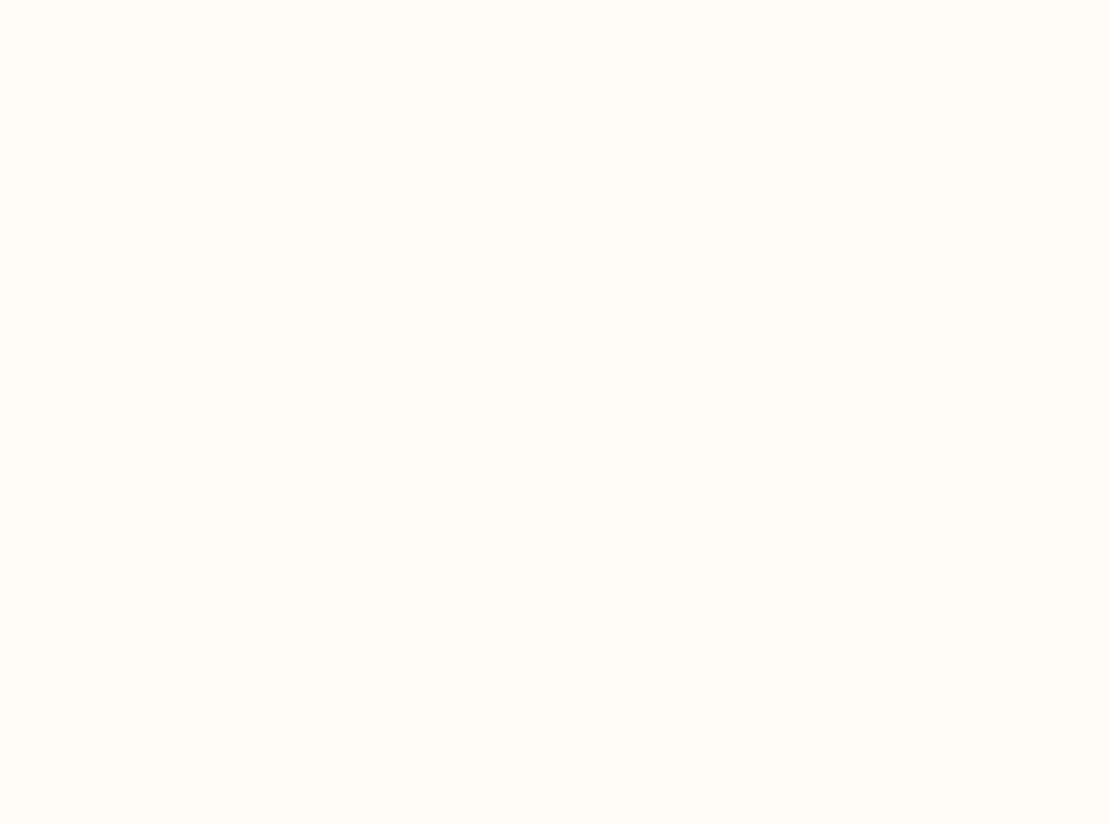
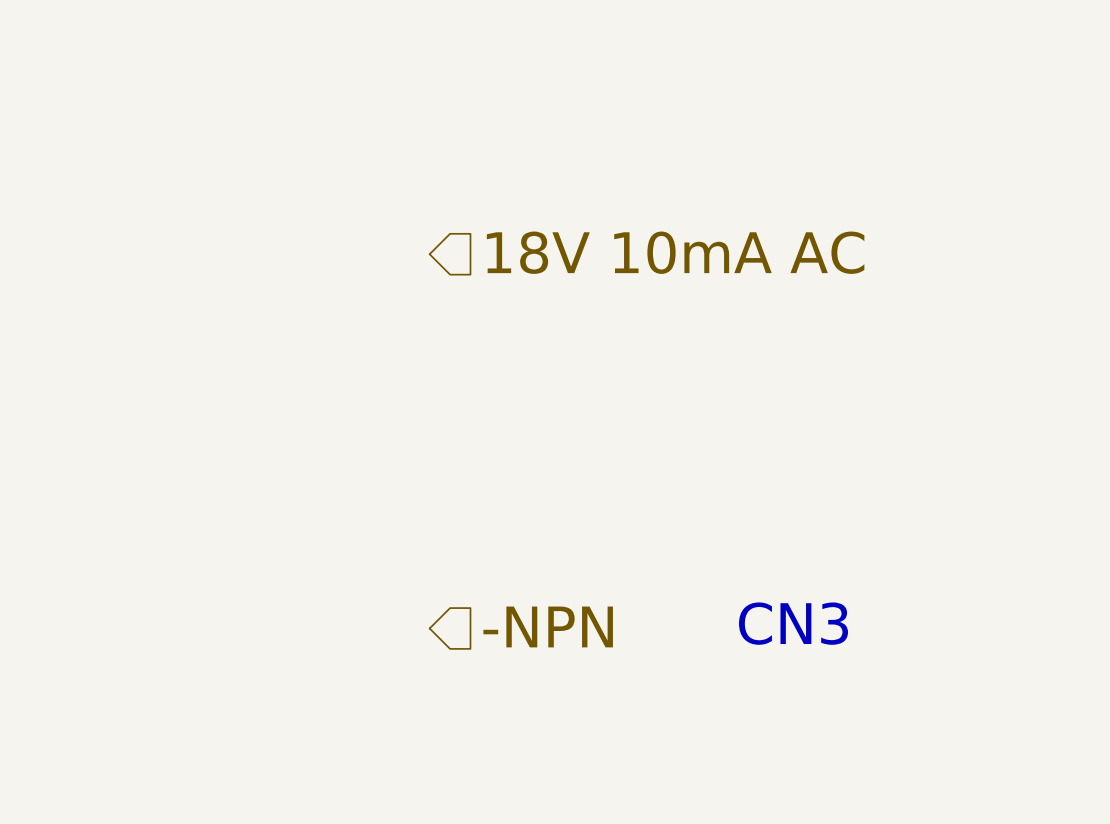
hierarchical label: none -> 18V 10mA AC (675, 252)
text: none -> CN3 (793, 623)
hierarchical label: none -> -NPN (548, 626)

